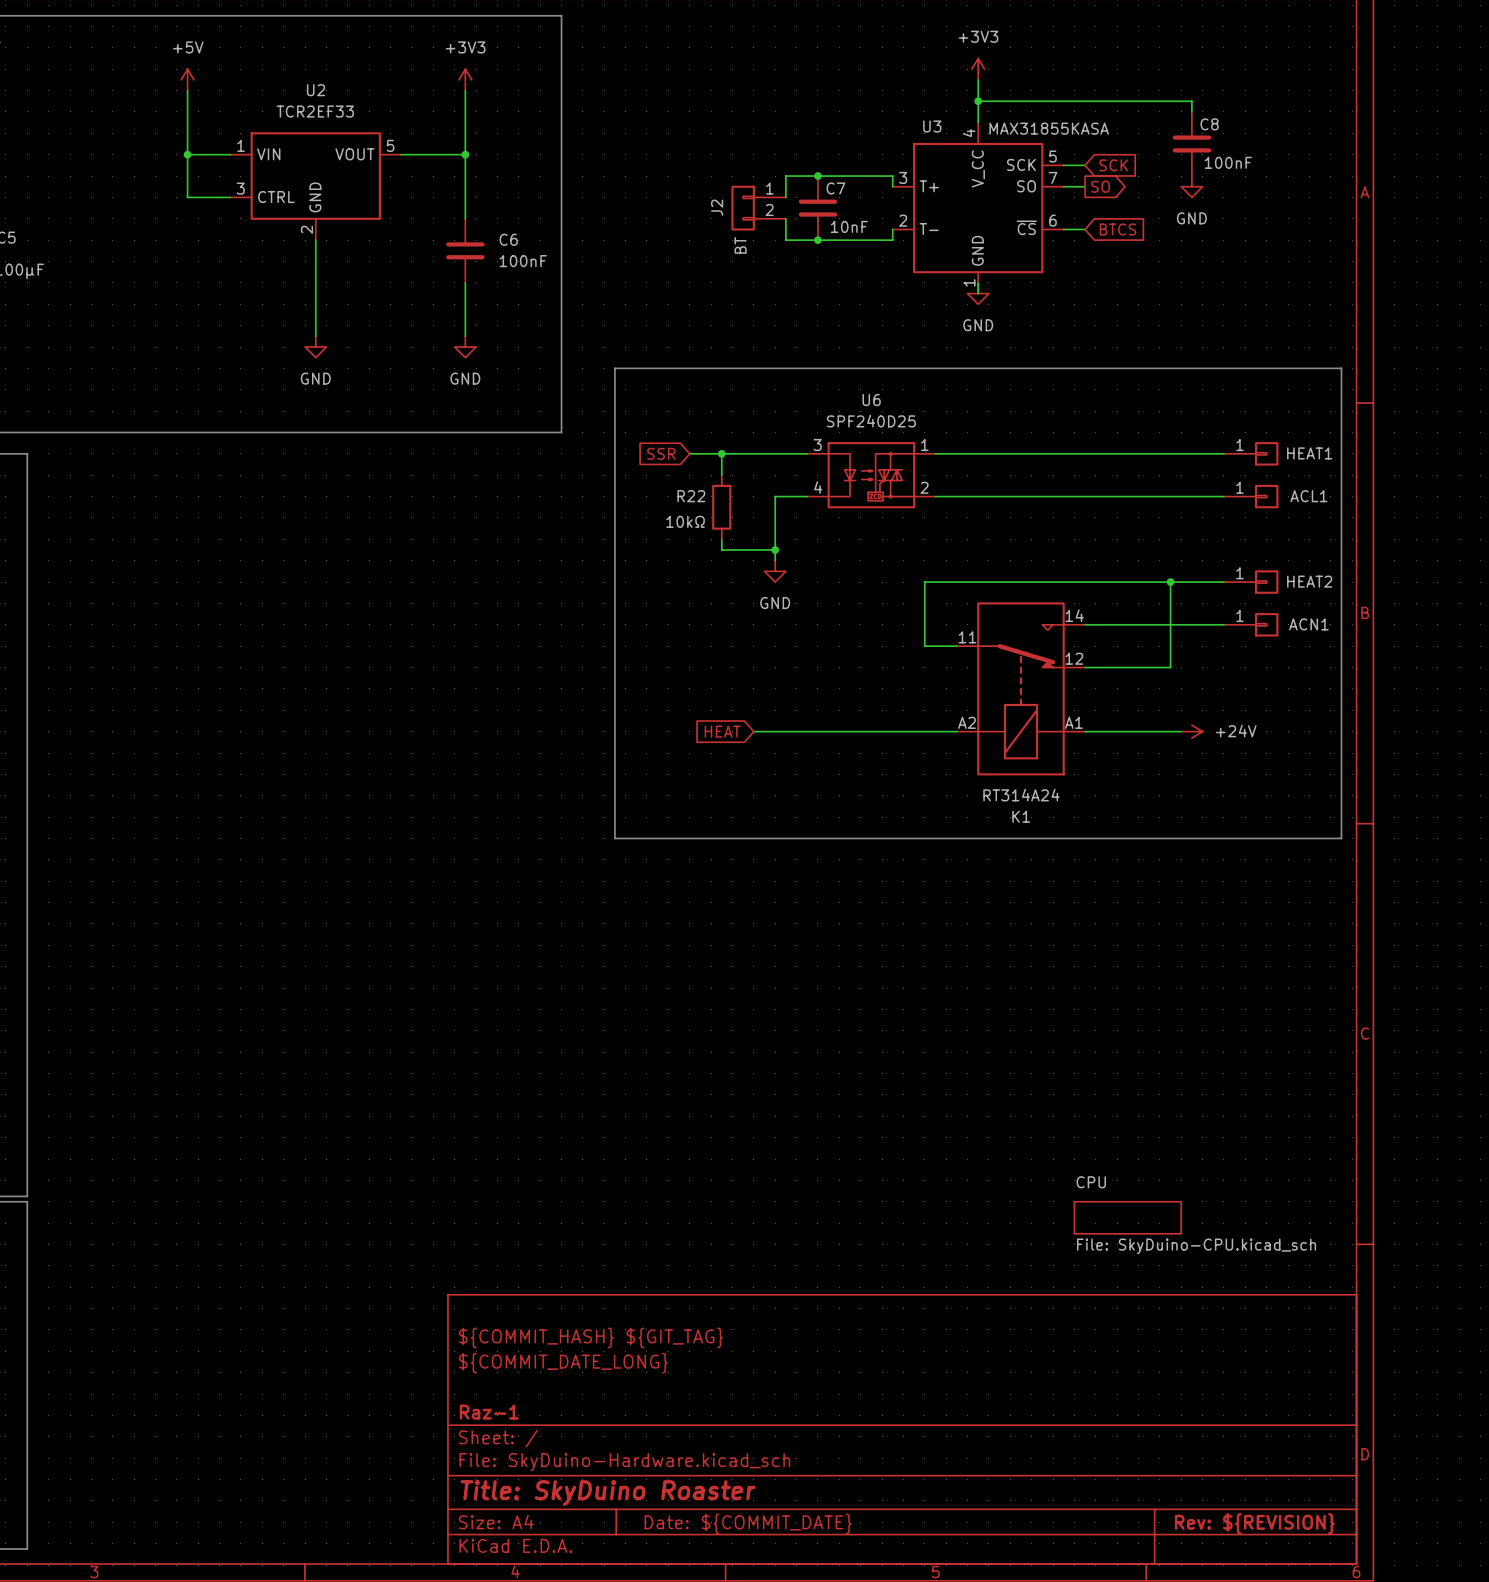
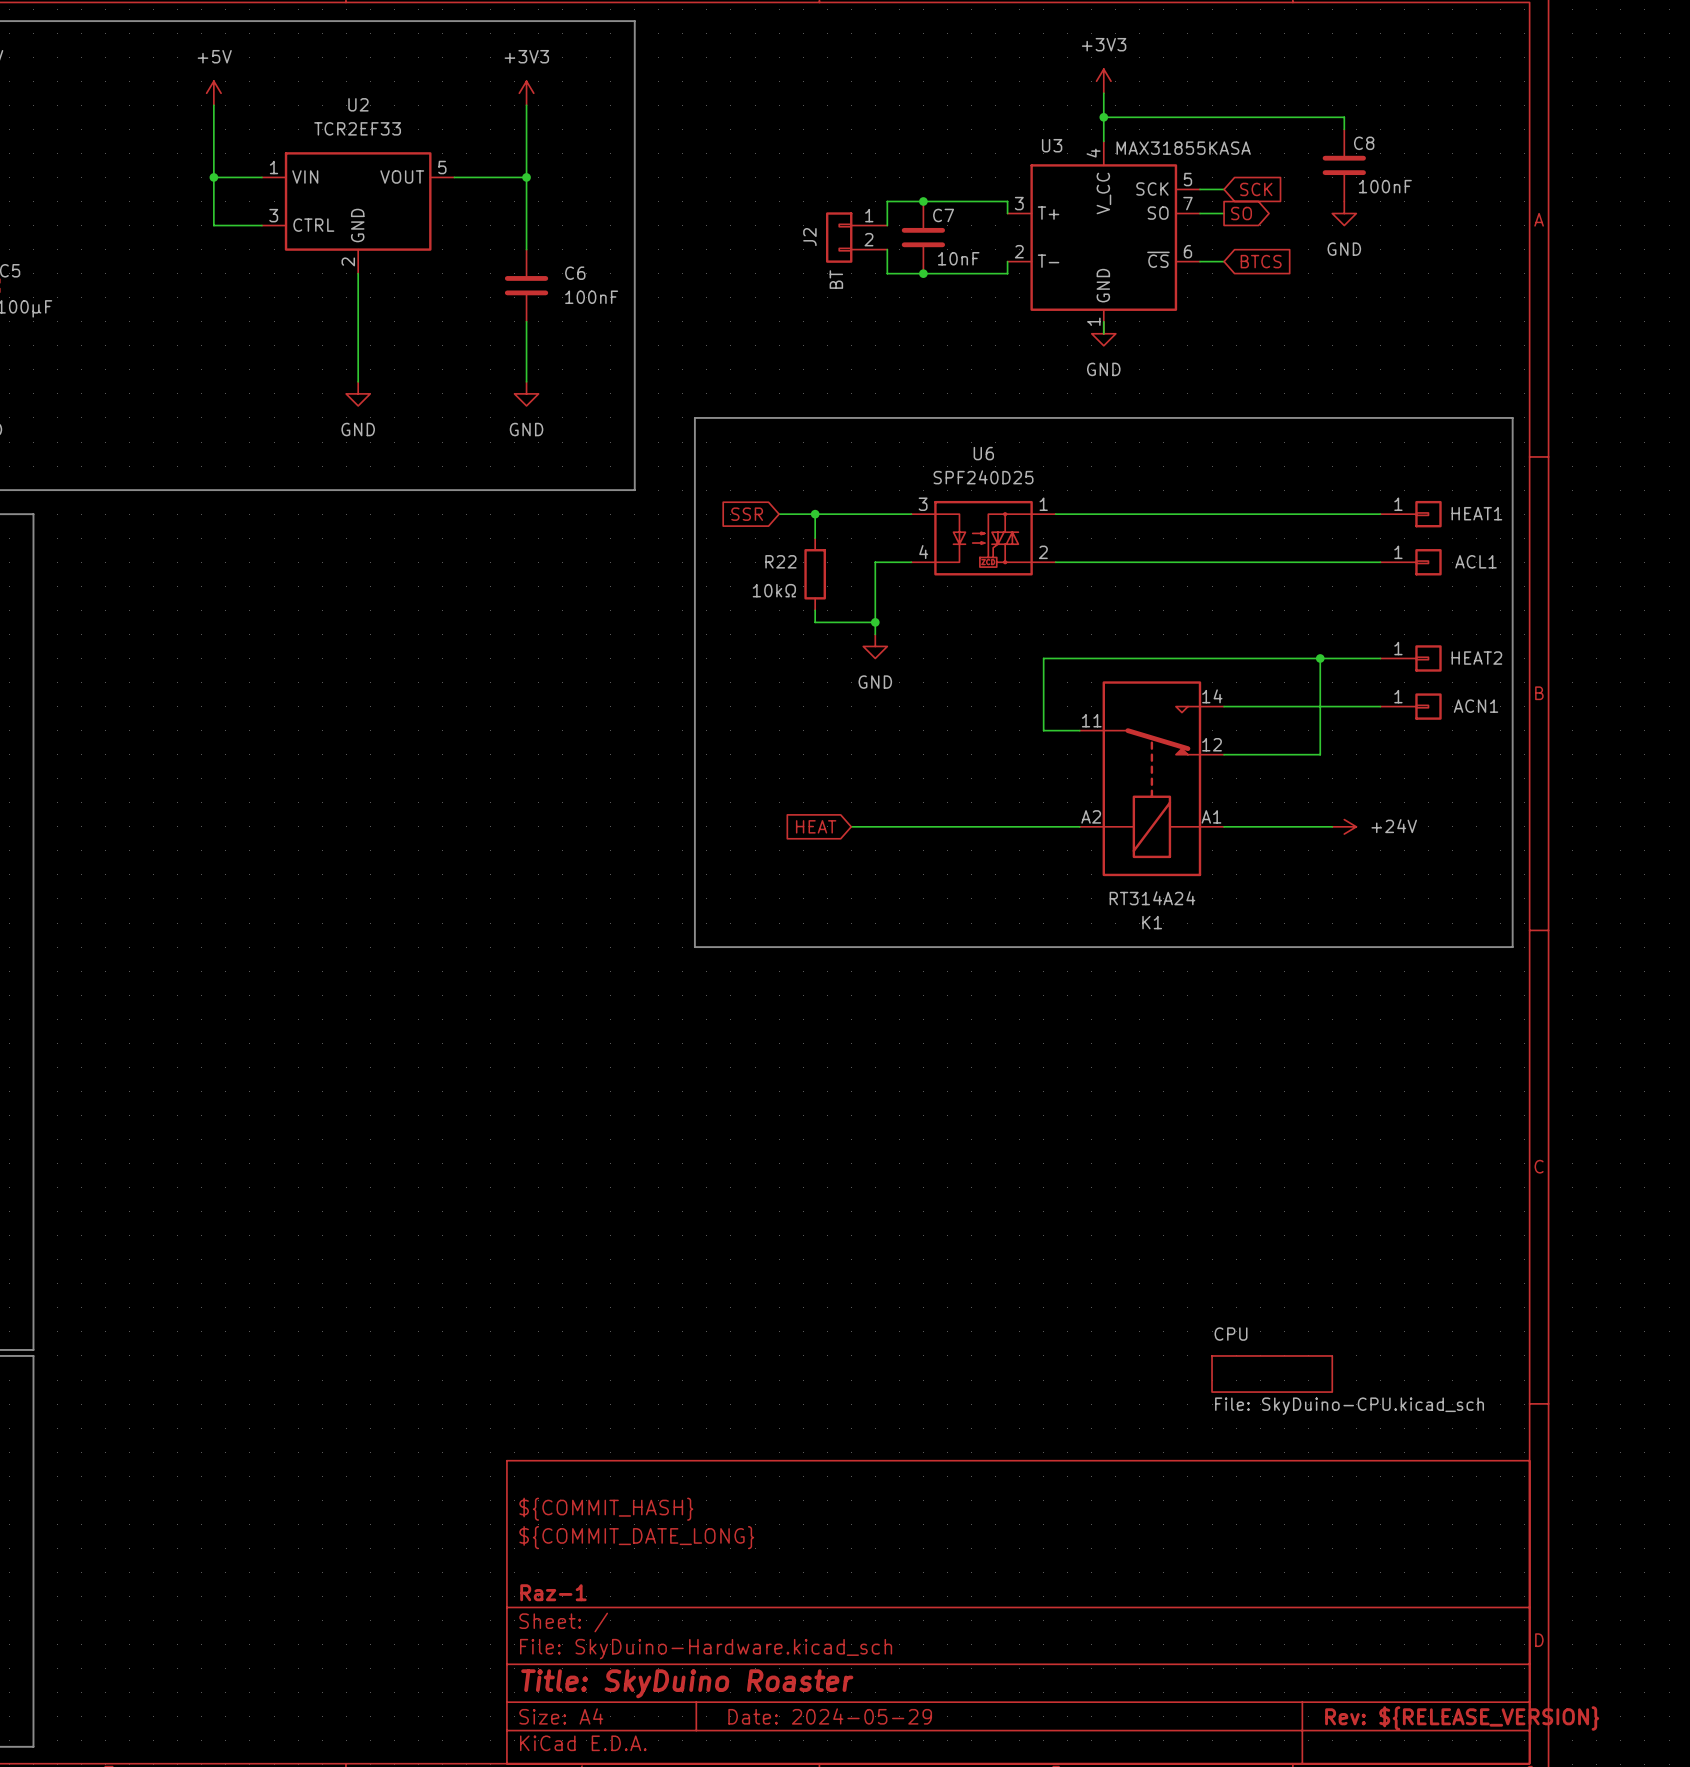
title block: ${COMMIT_HASH} ${GIT_TAG} (590, 1337) -> ${COMMIT_HASH} (606, 1509)
title block: Date: ${COMMIT_DATE} (748, 1523) -> Date: 2024-05-29 (830, 1716)
title block: Rev: ${REVISION} (1254, 1523) -> Rev: ${RELEASE_VERSION} (1462, 1718)

